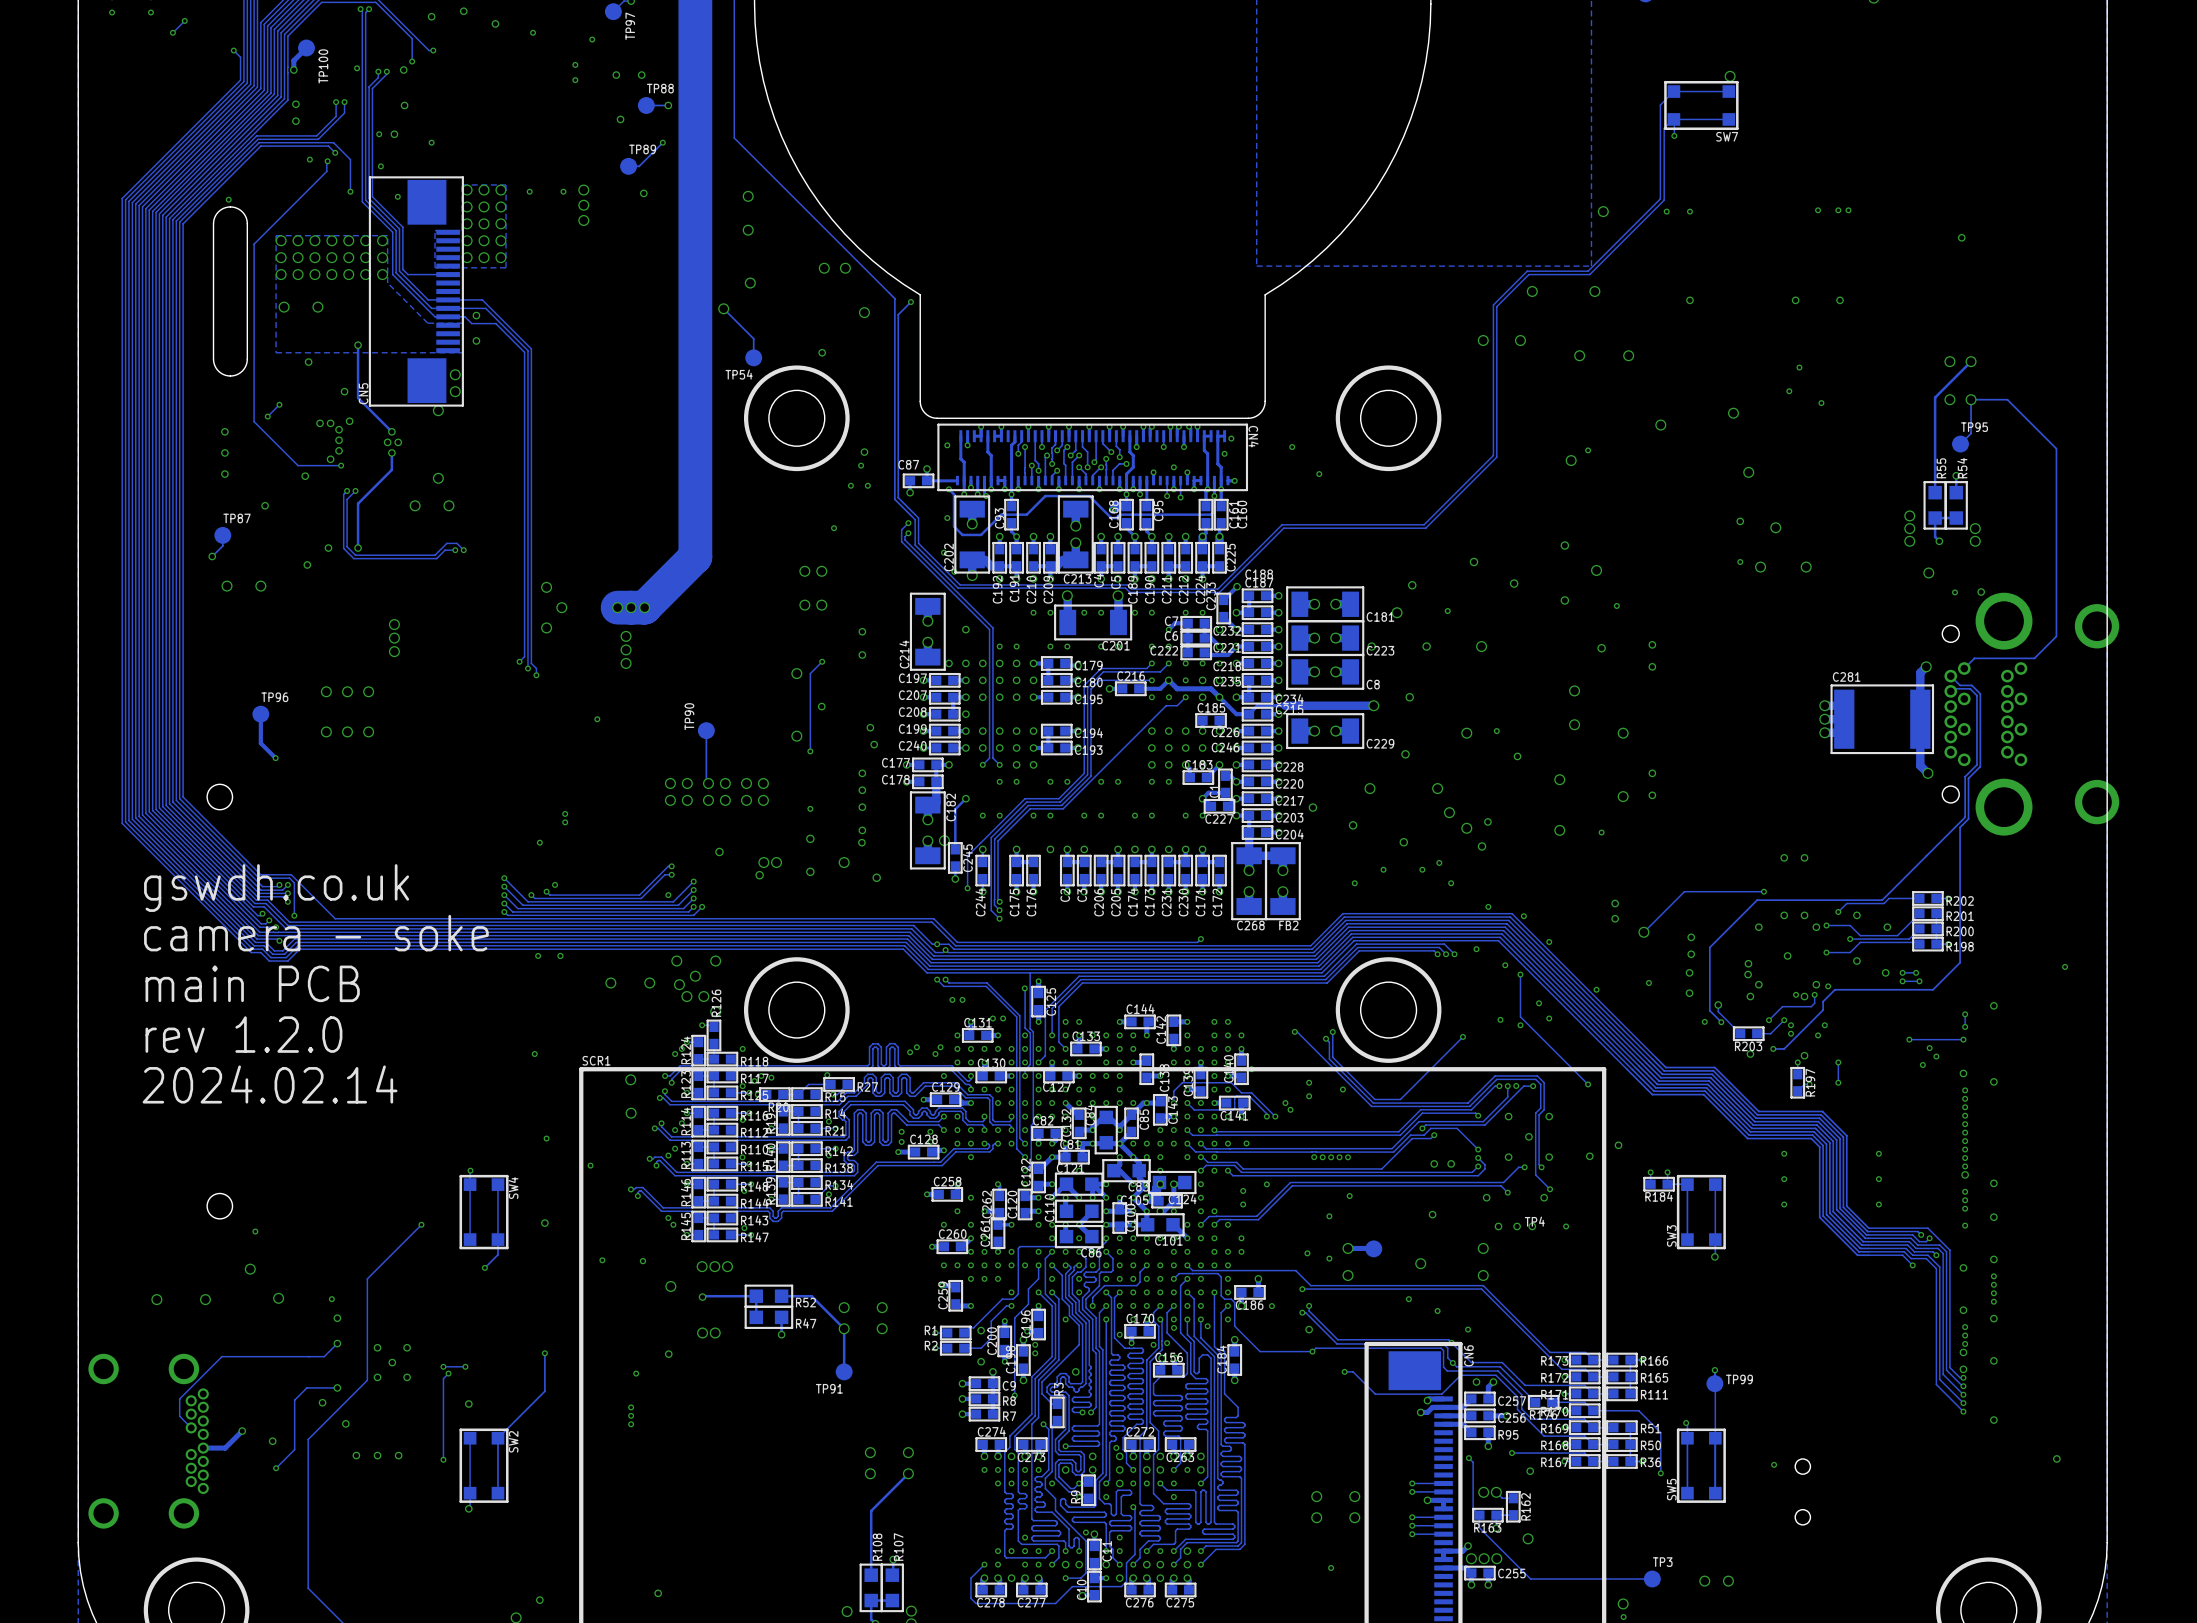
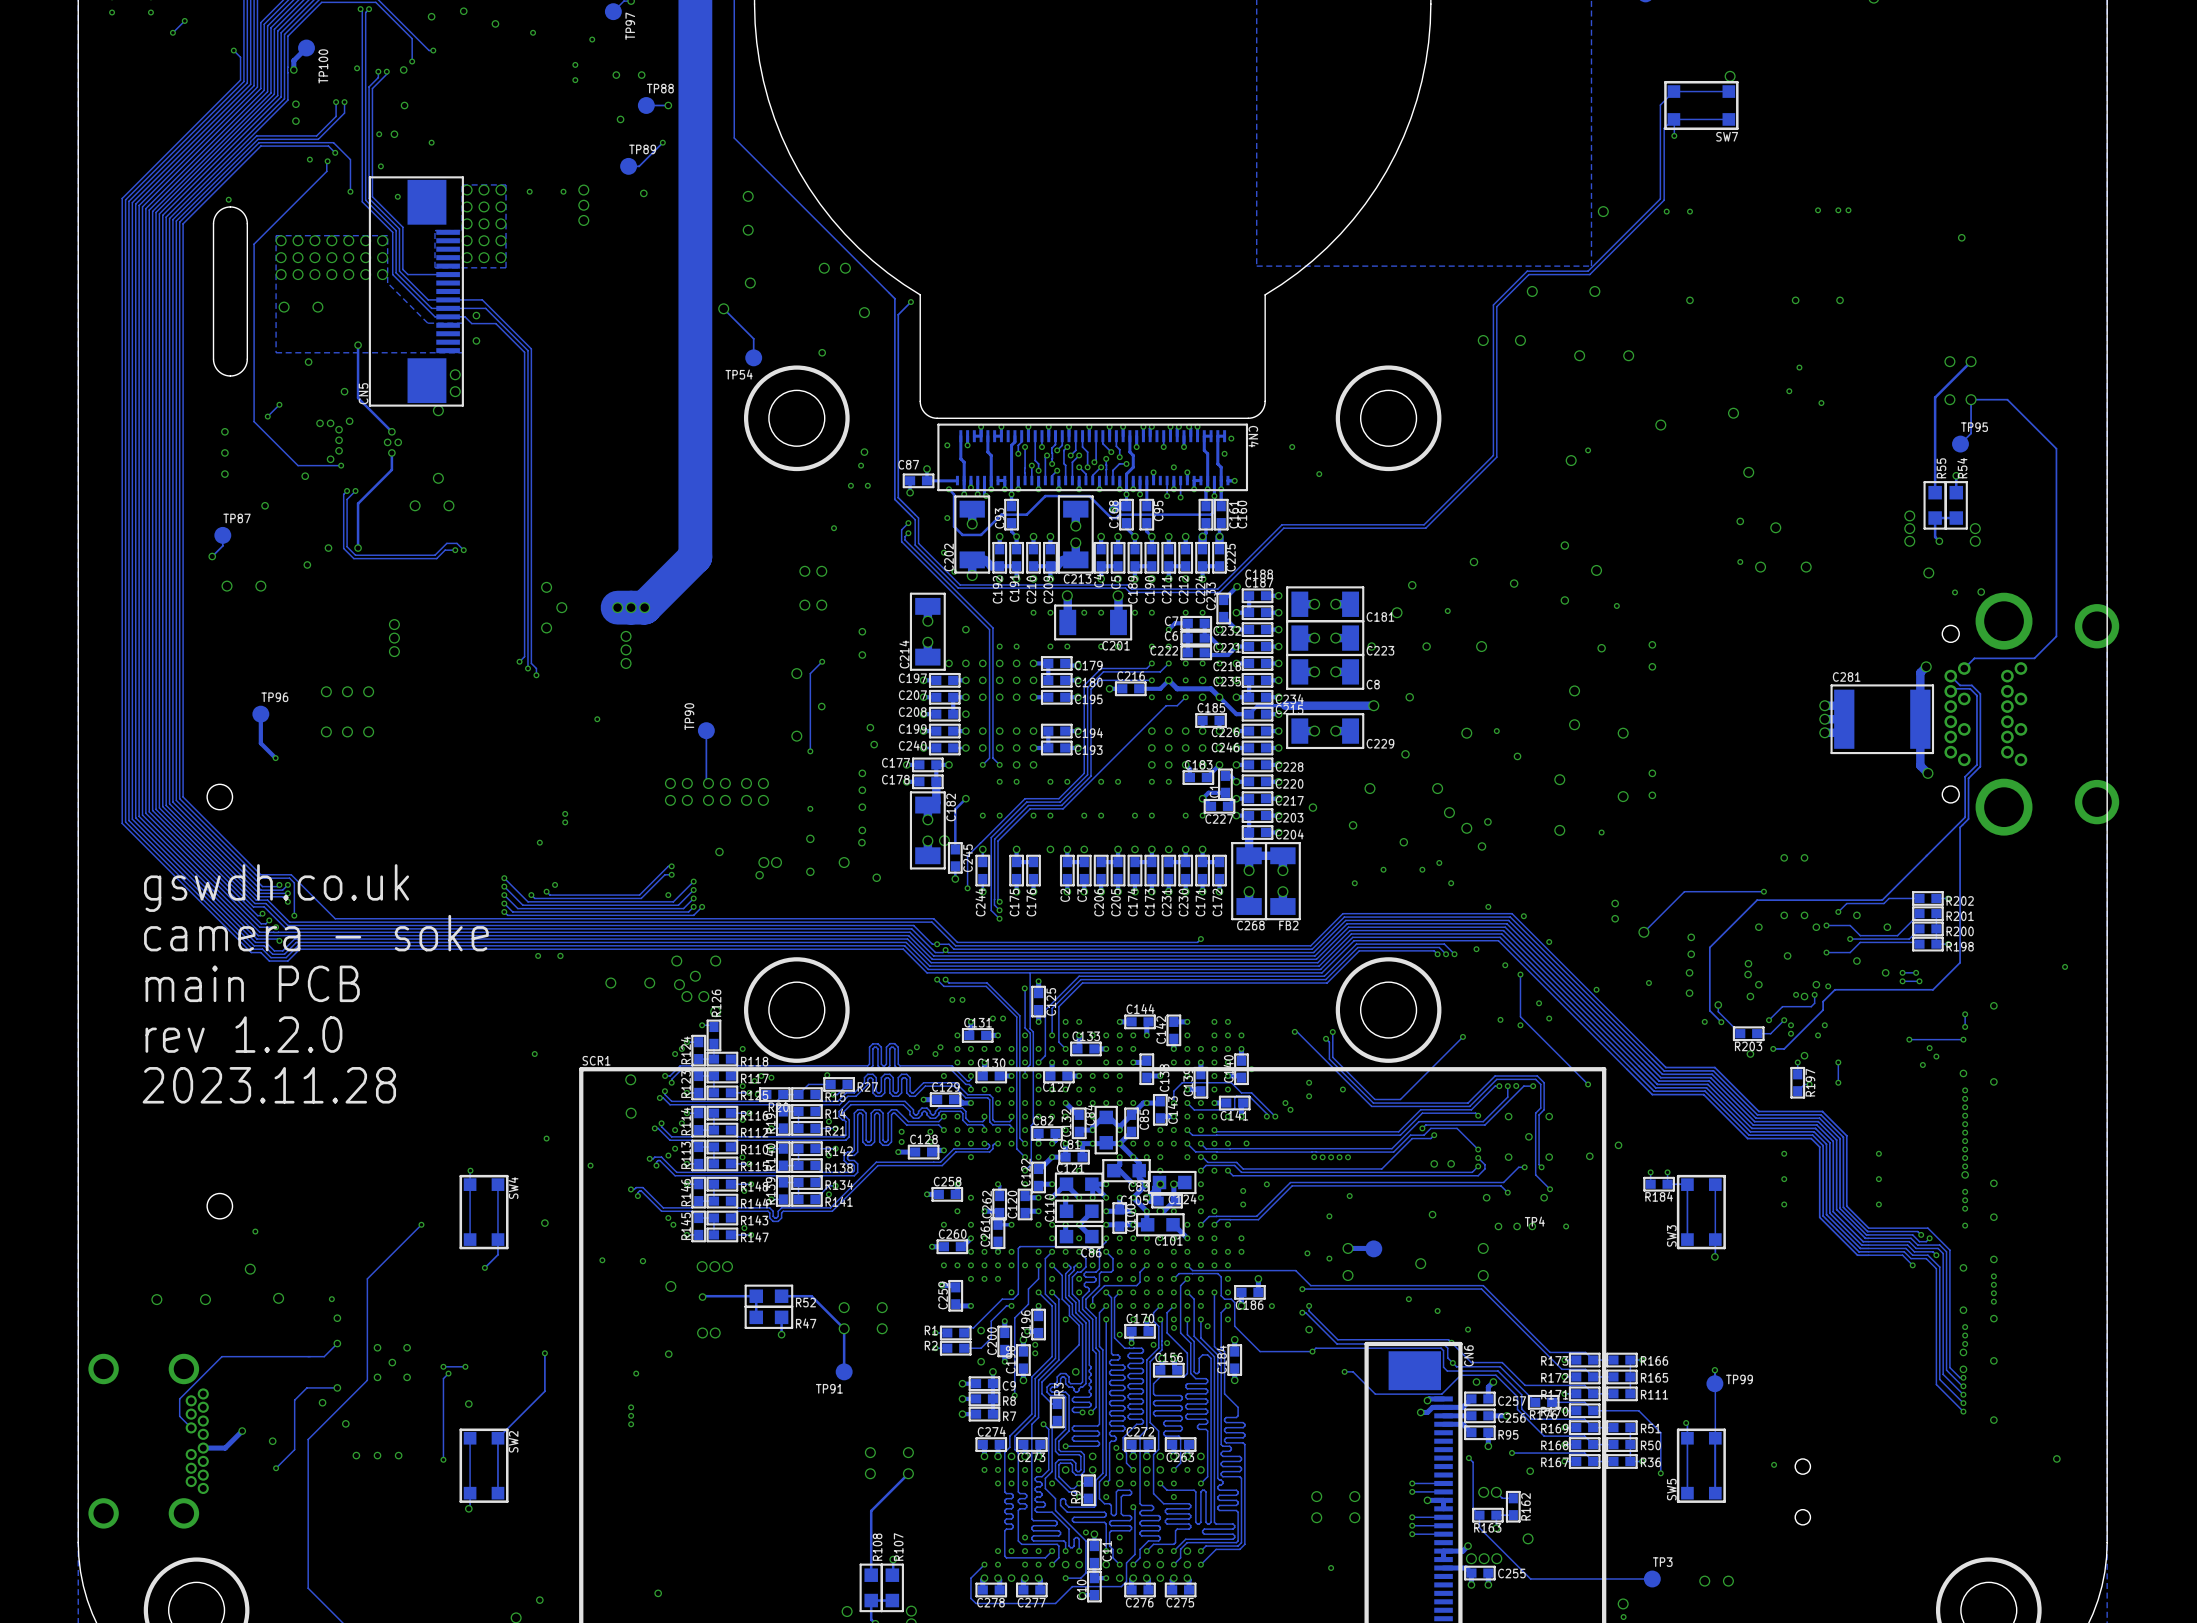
text: 2024.02.14 (270, 1084) -> 2023.11.28 (269, 1085)

